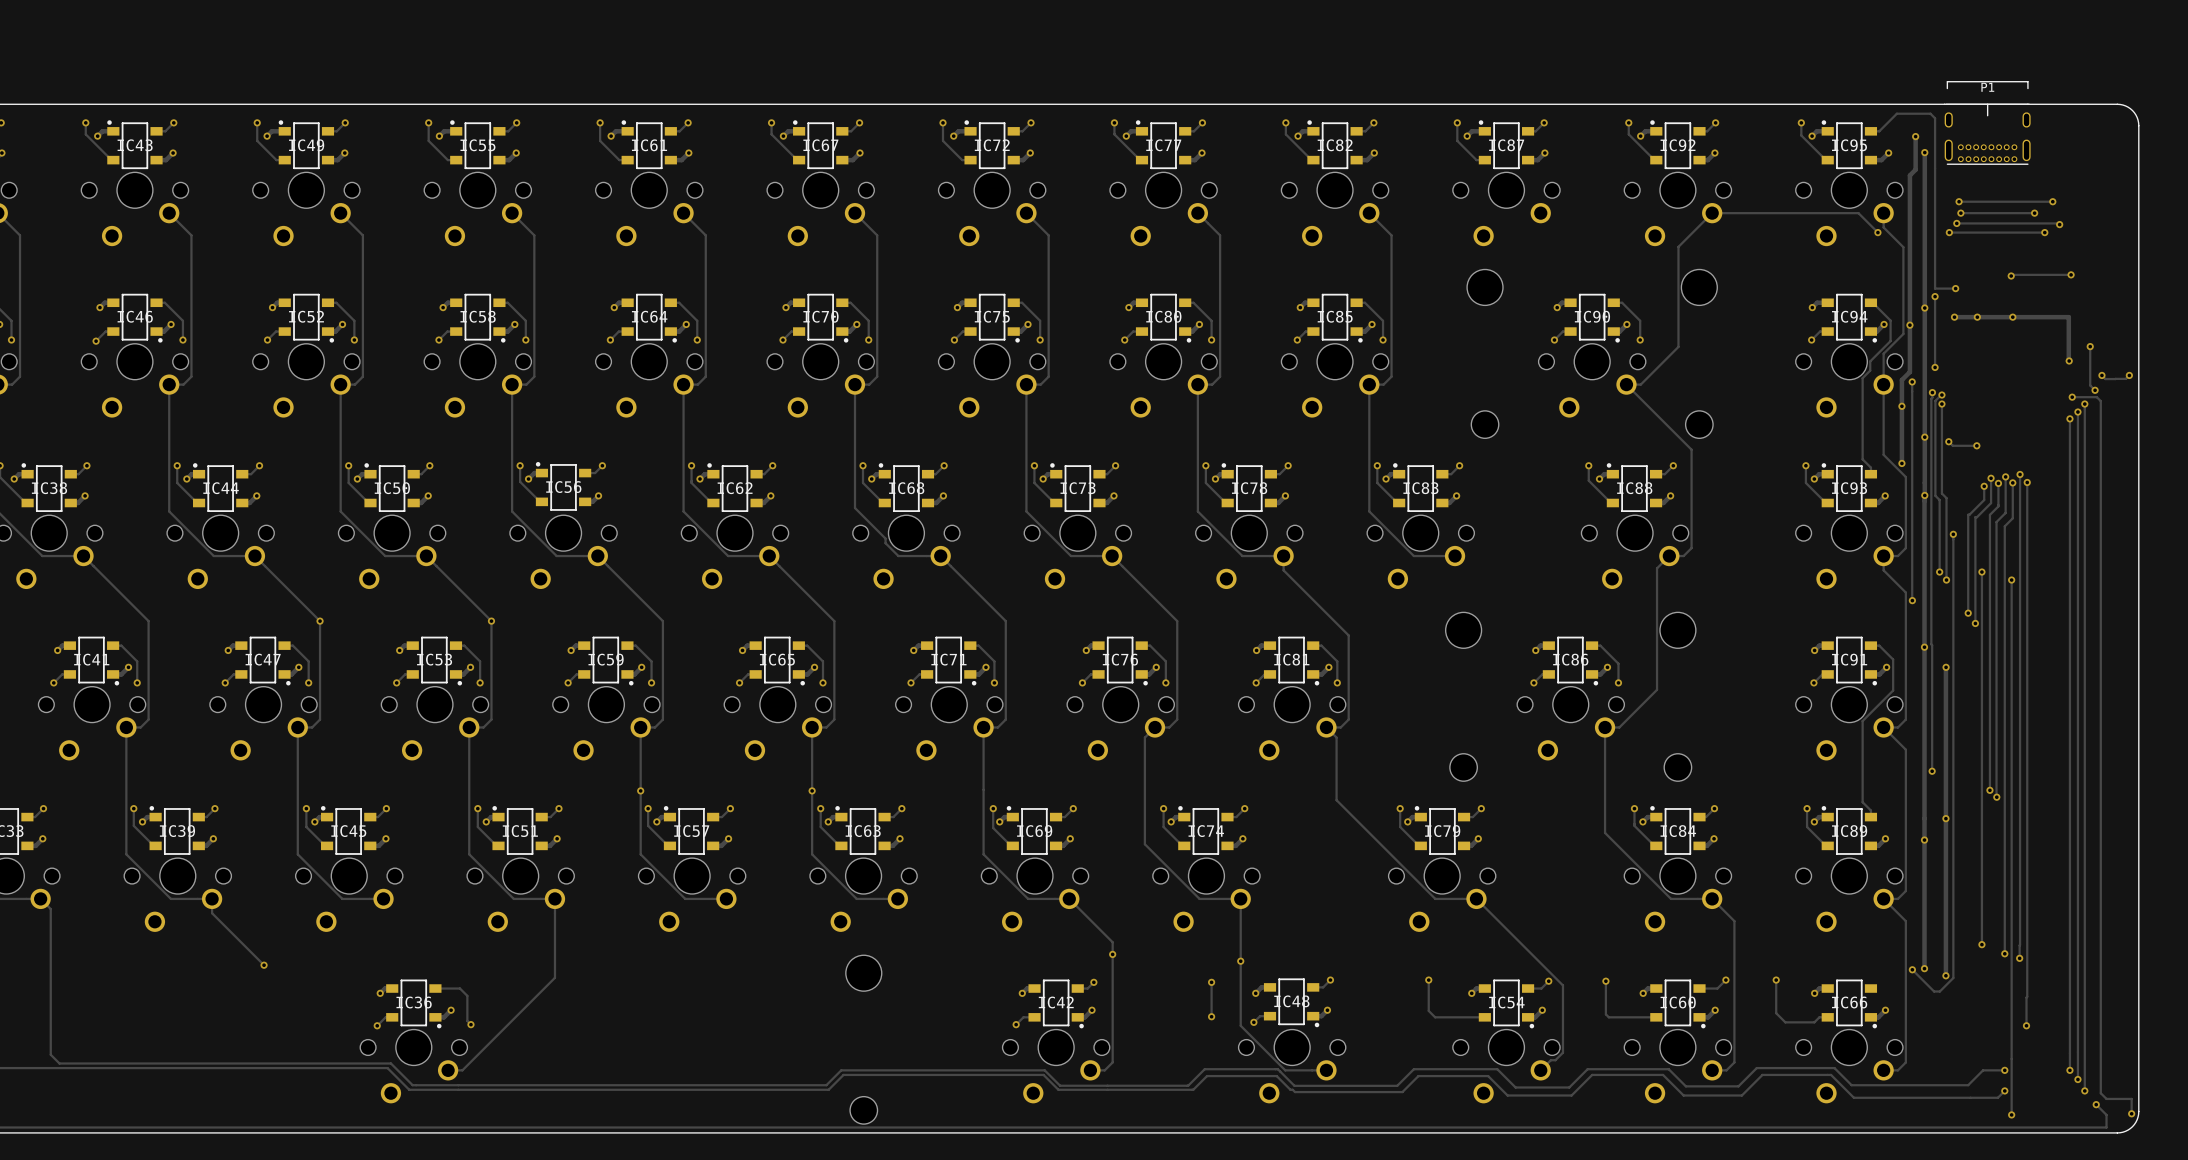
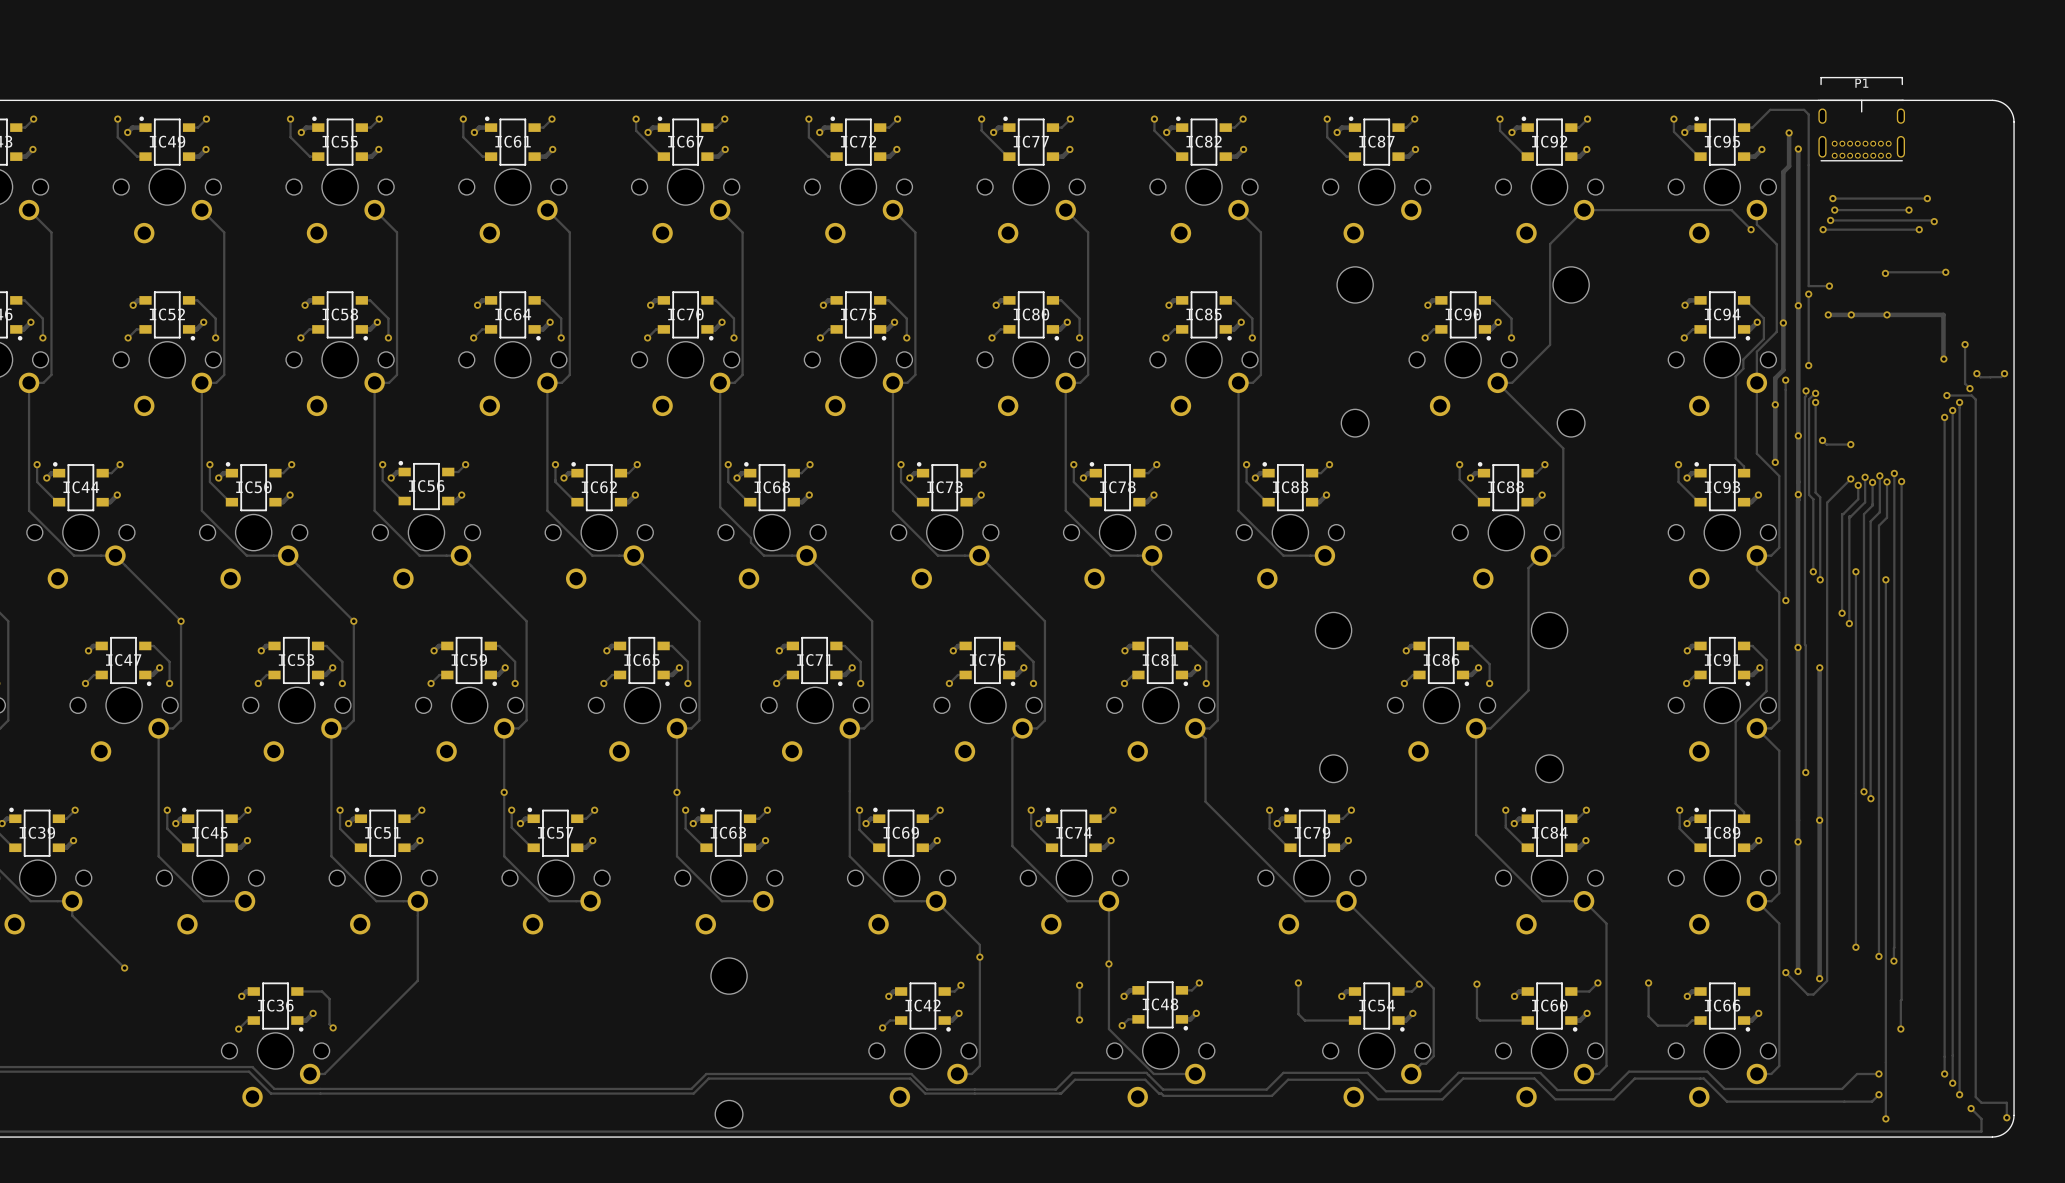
track: none -> (1850, 478) (1827, 502) (1827, 533)
via: none -> (1850, 478)
via: (1953, 534) -> none

